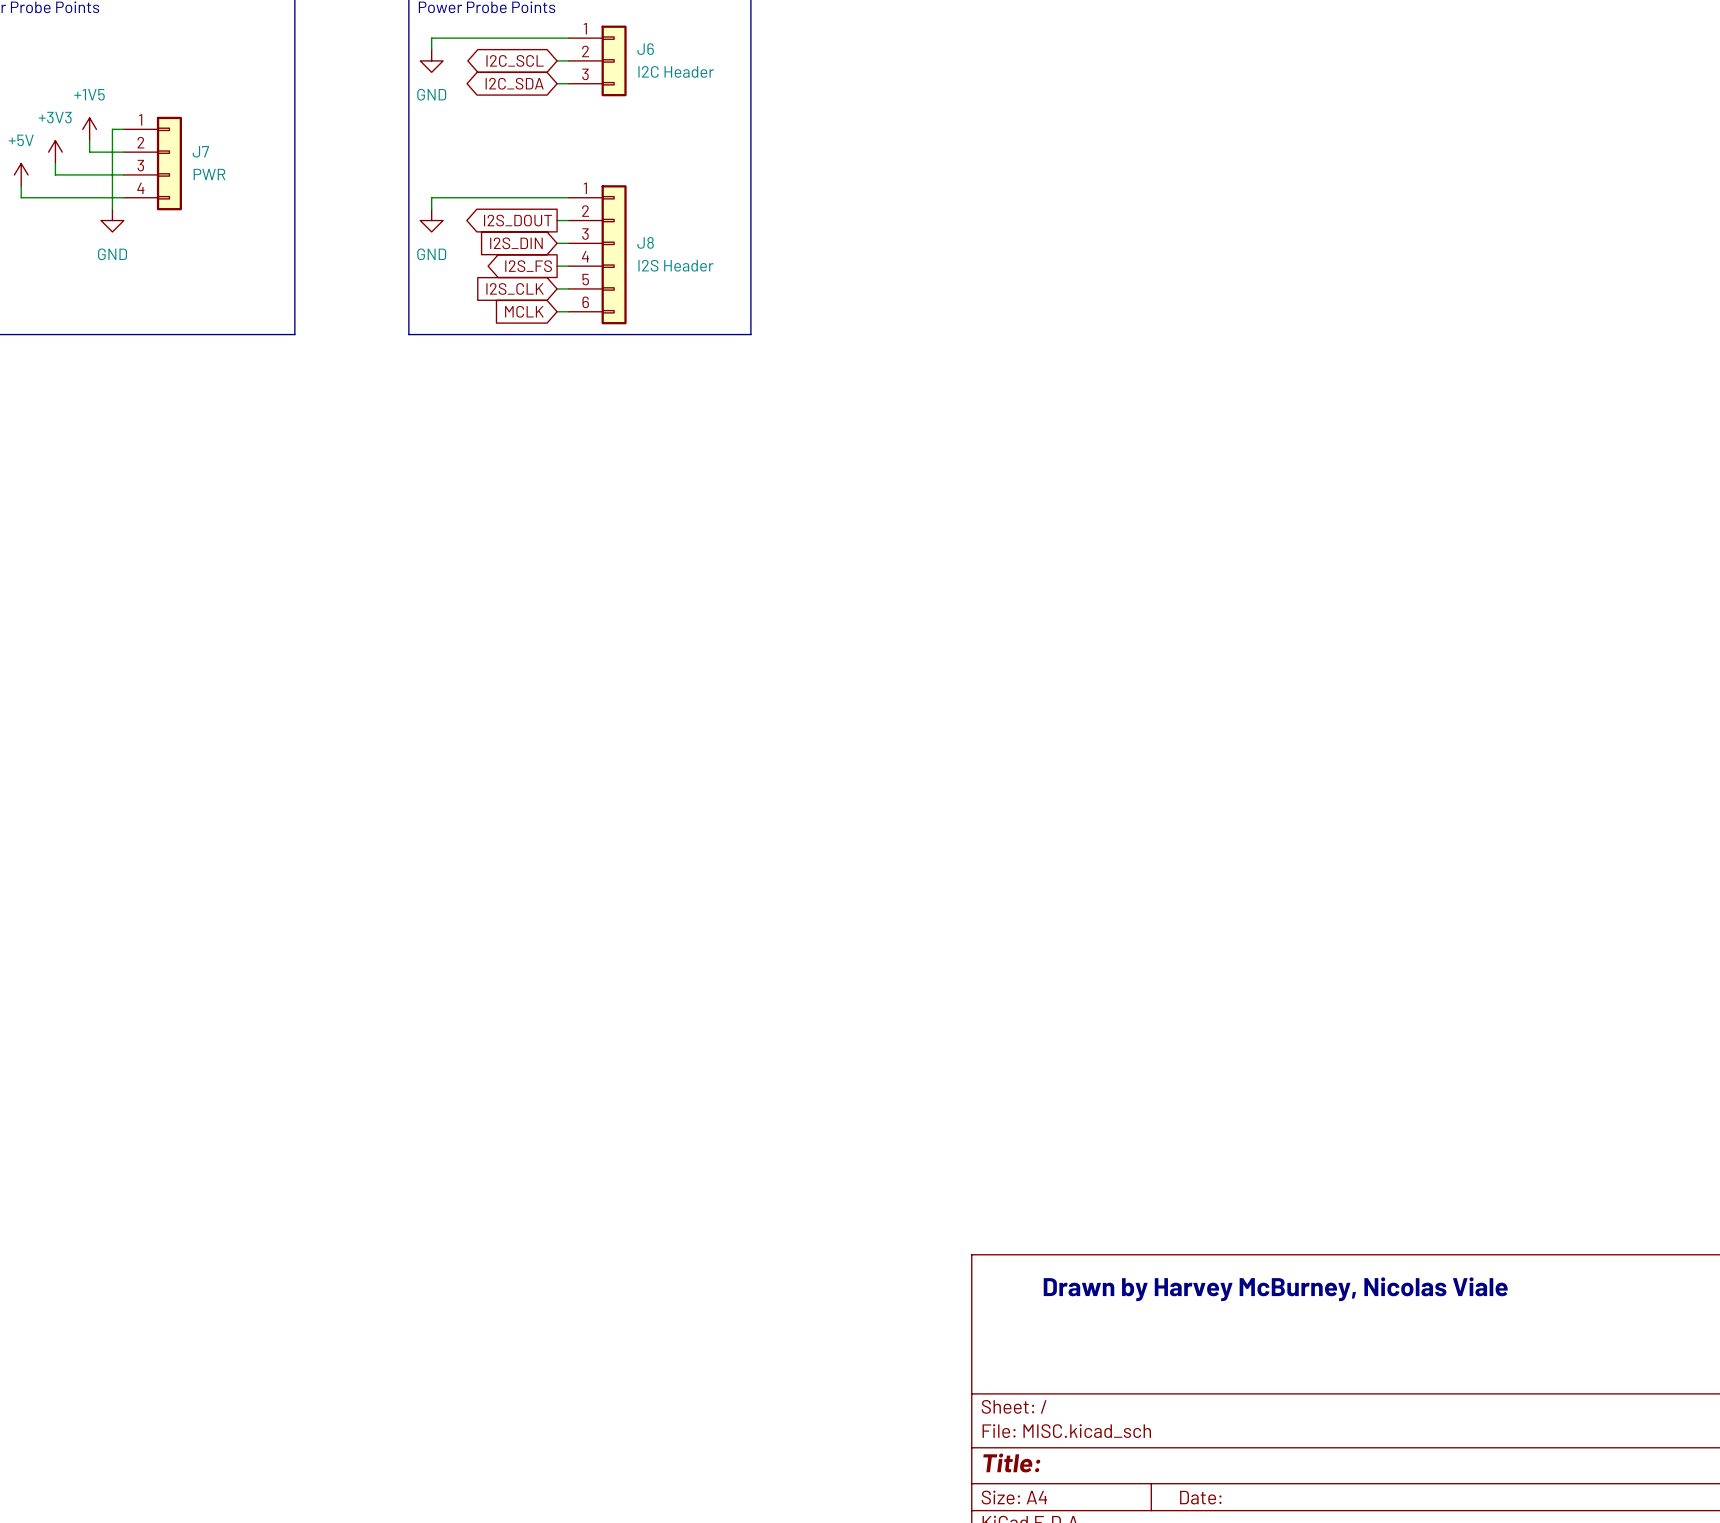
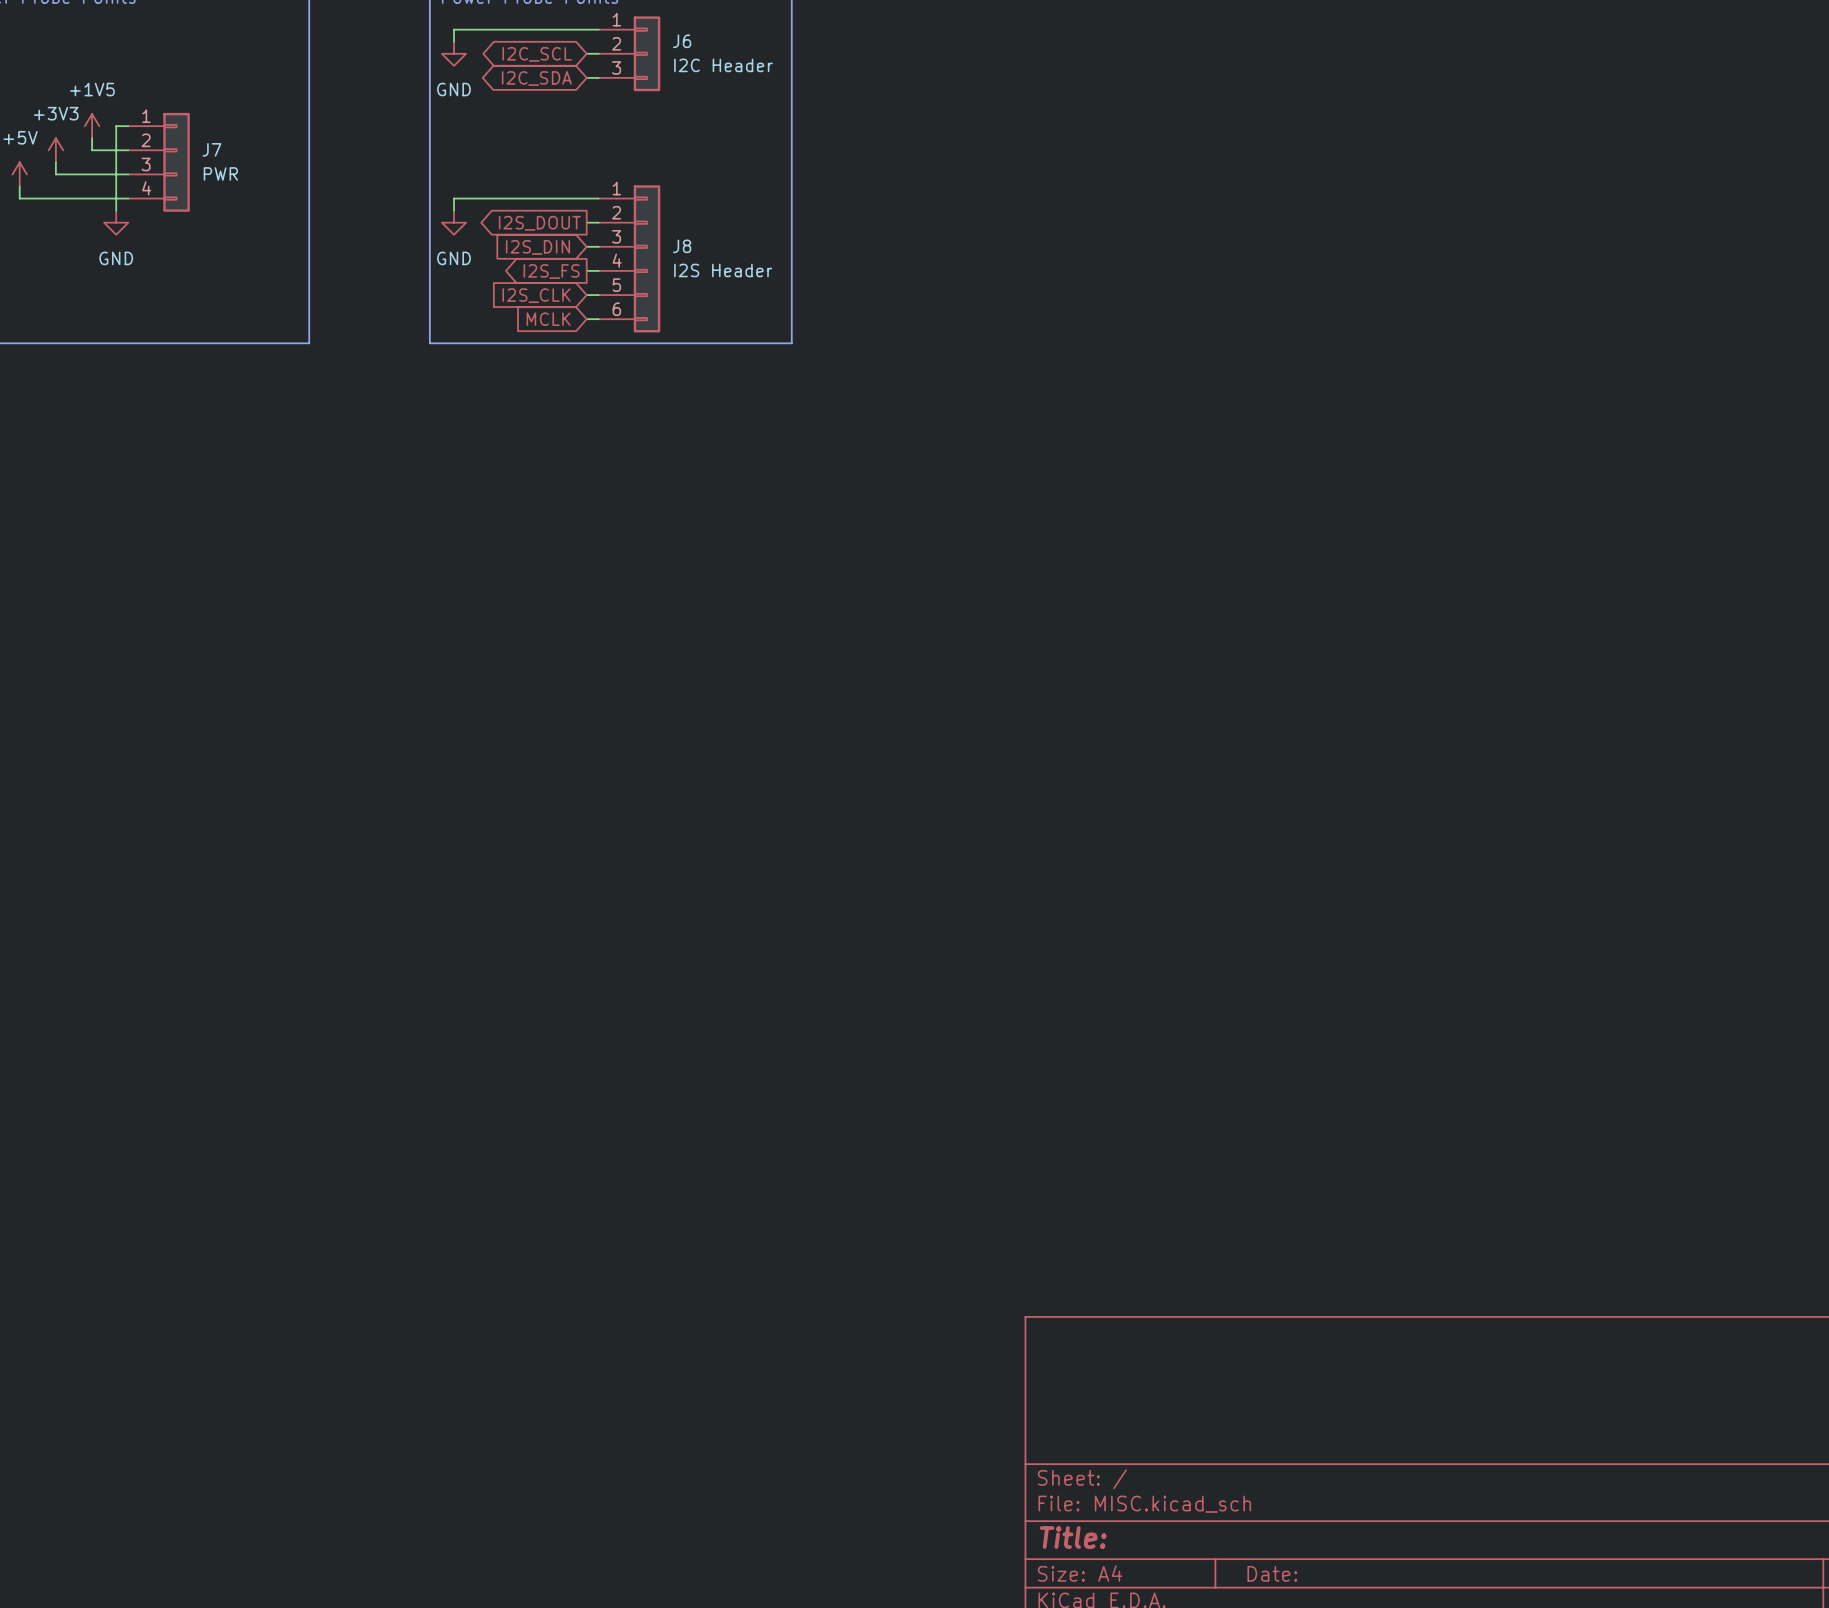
text: Drawn by Harvey McBurney, Nicolas Viale (1275, 1289) -> none

